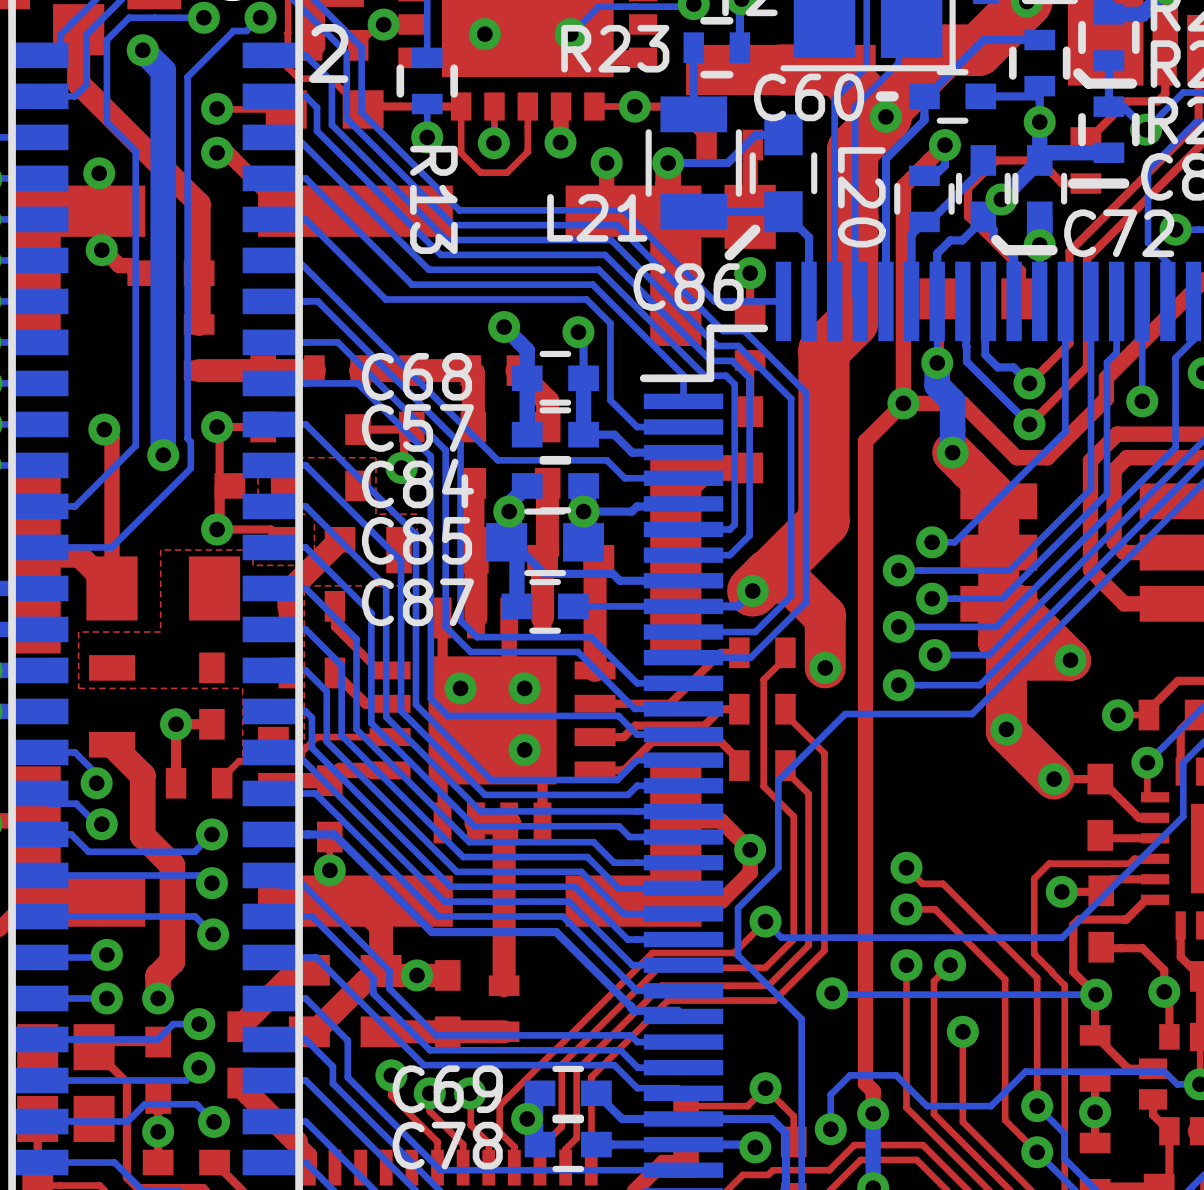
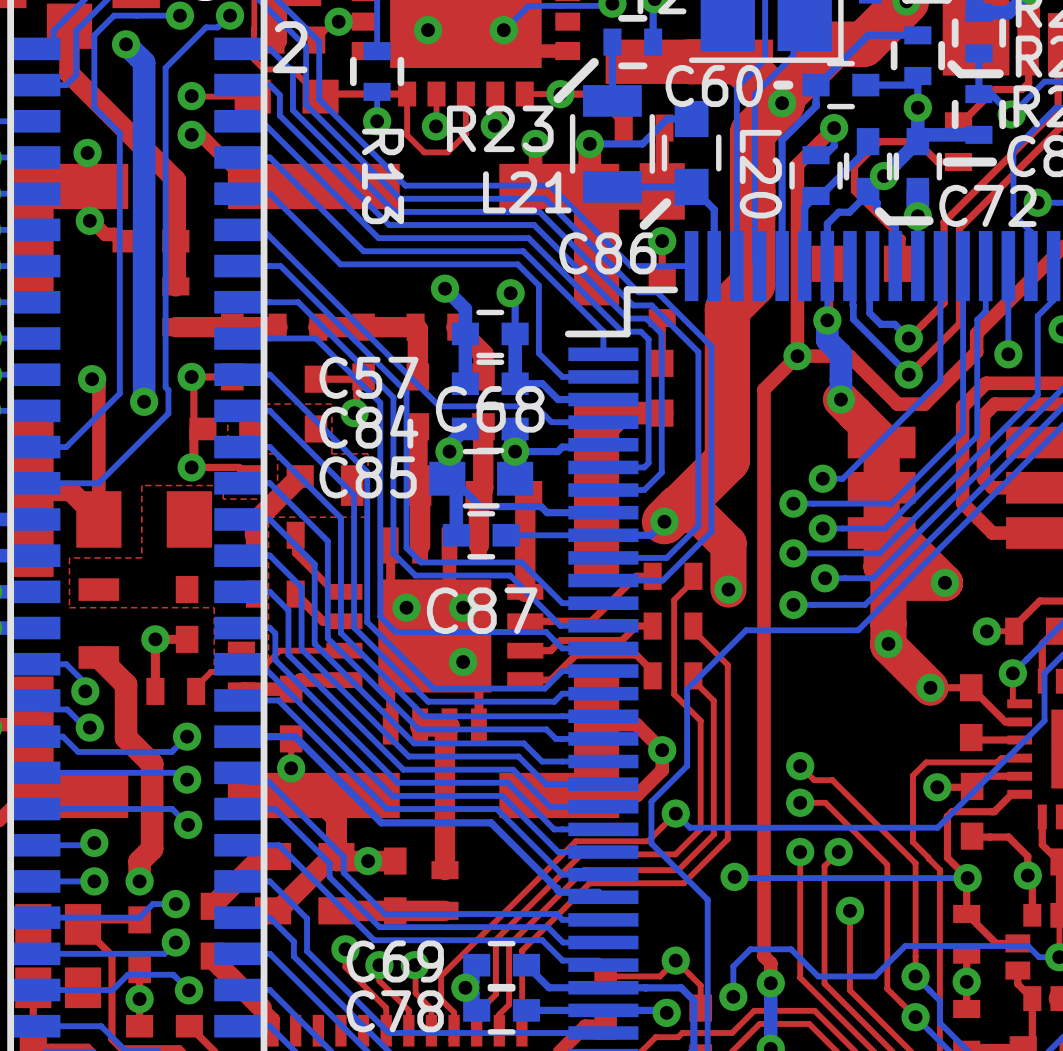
R23 name position: R23 (615, 48) -> R23 (500, 128)
line: none -> (594, 62) (558, 98)
C68 name position: C68 (416, 376) -> C68 (490, 409)
C87 name position: C87 (417, 602) -> C87 (482, 610)

